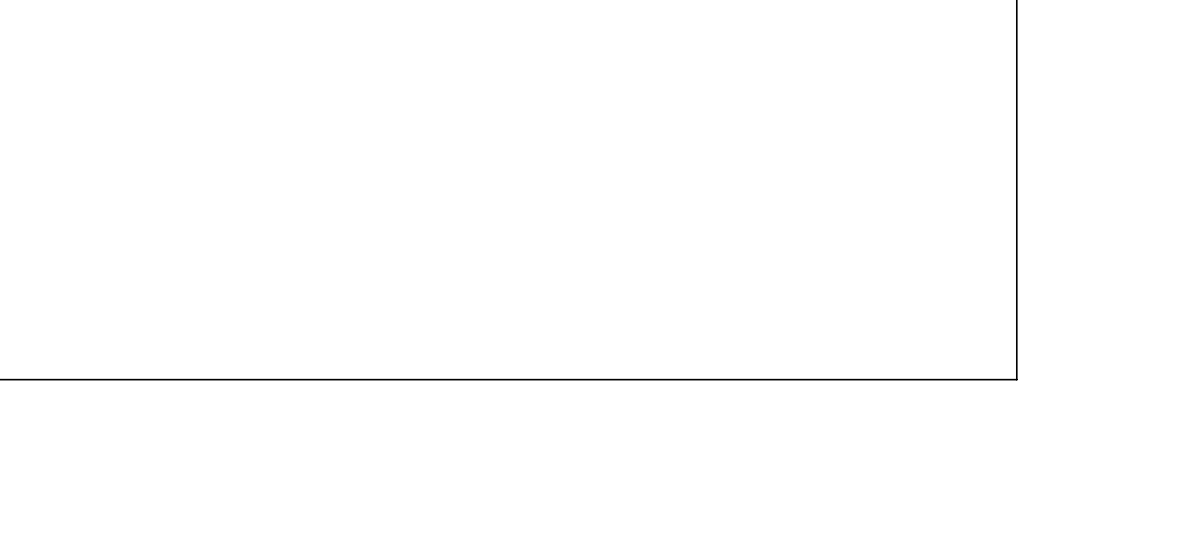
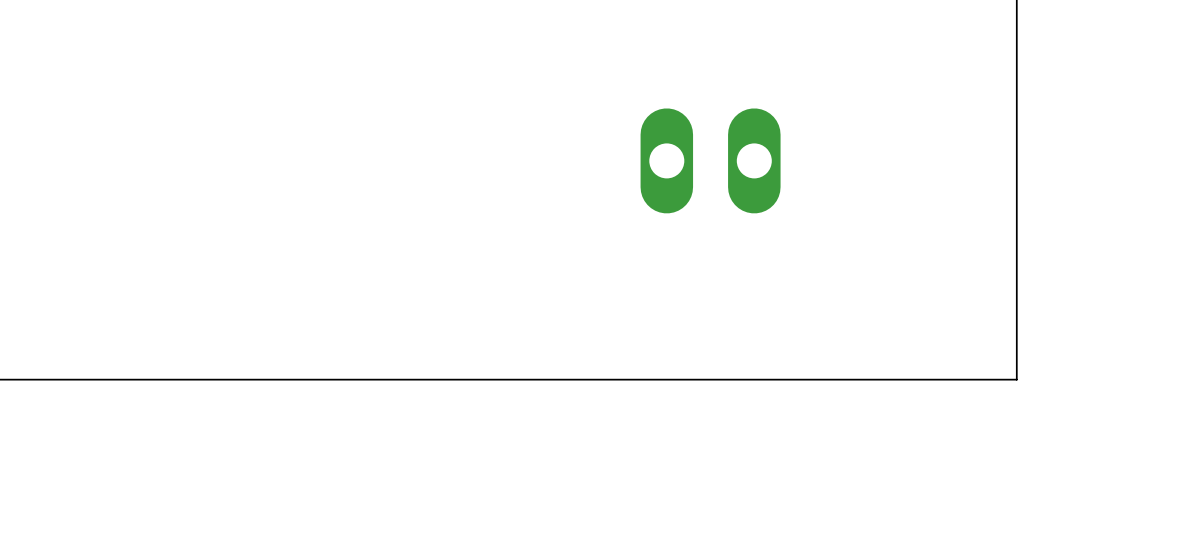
part: none -> (710, 160)

